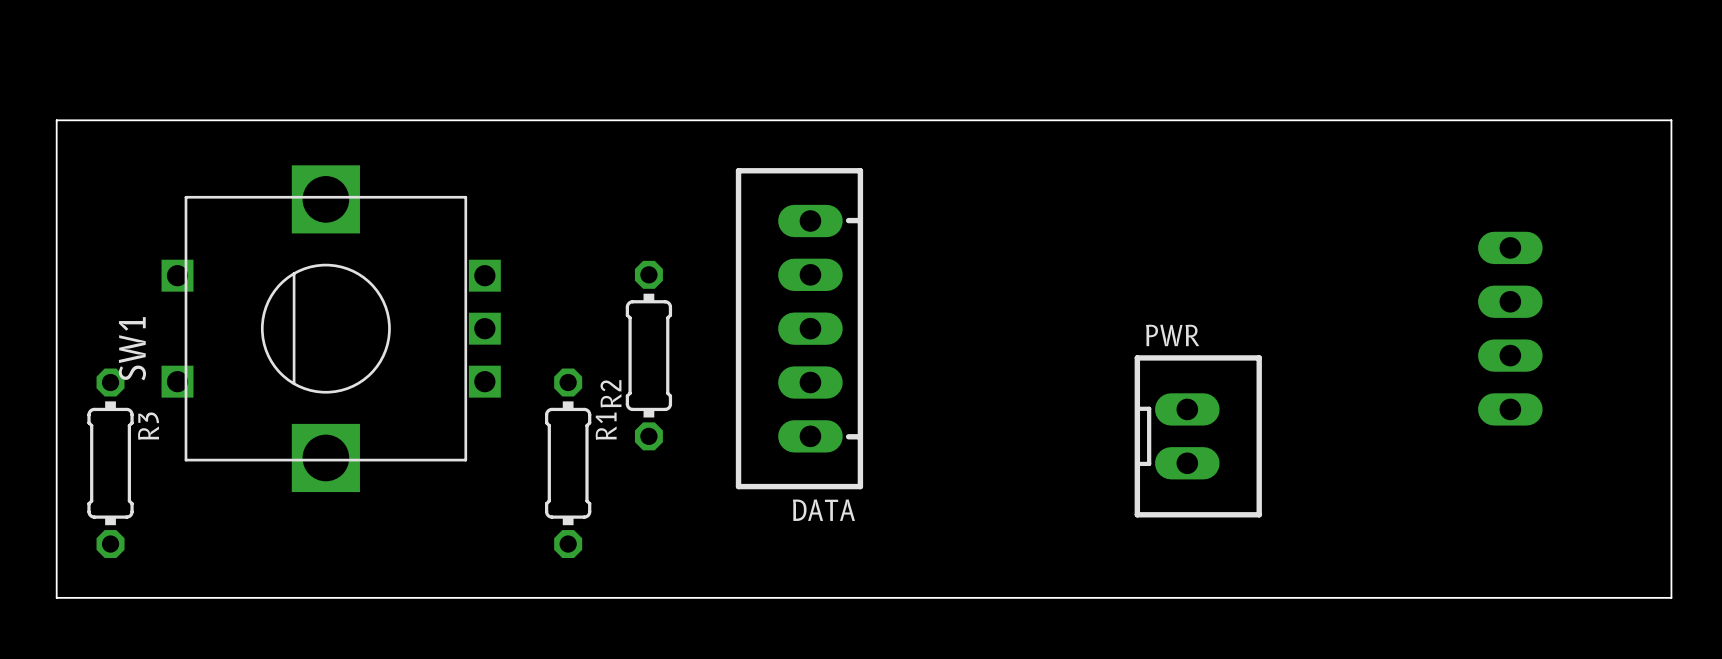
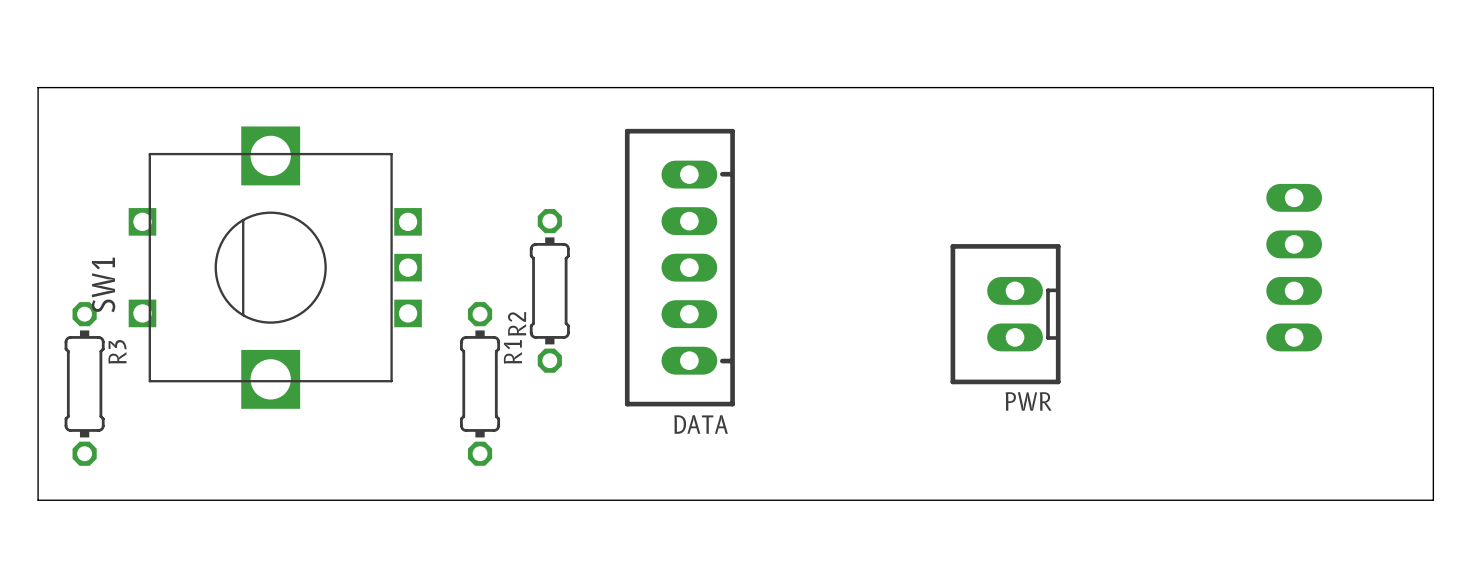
PWR rotation: 0° (1198, 436) -> 180° (1005, 314)

